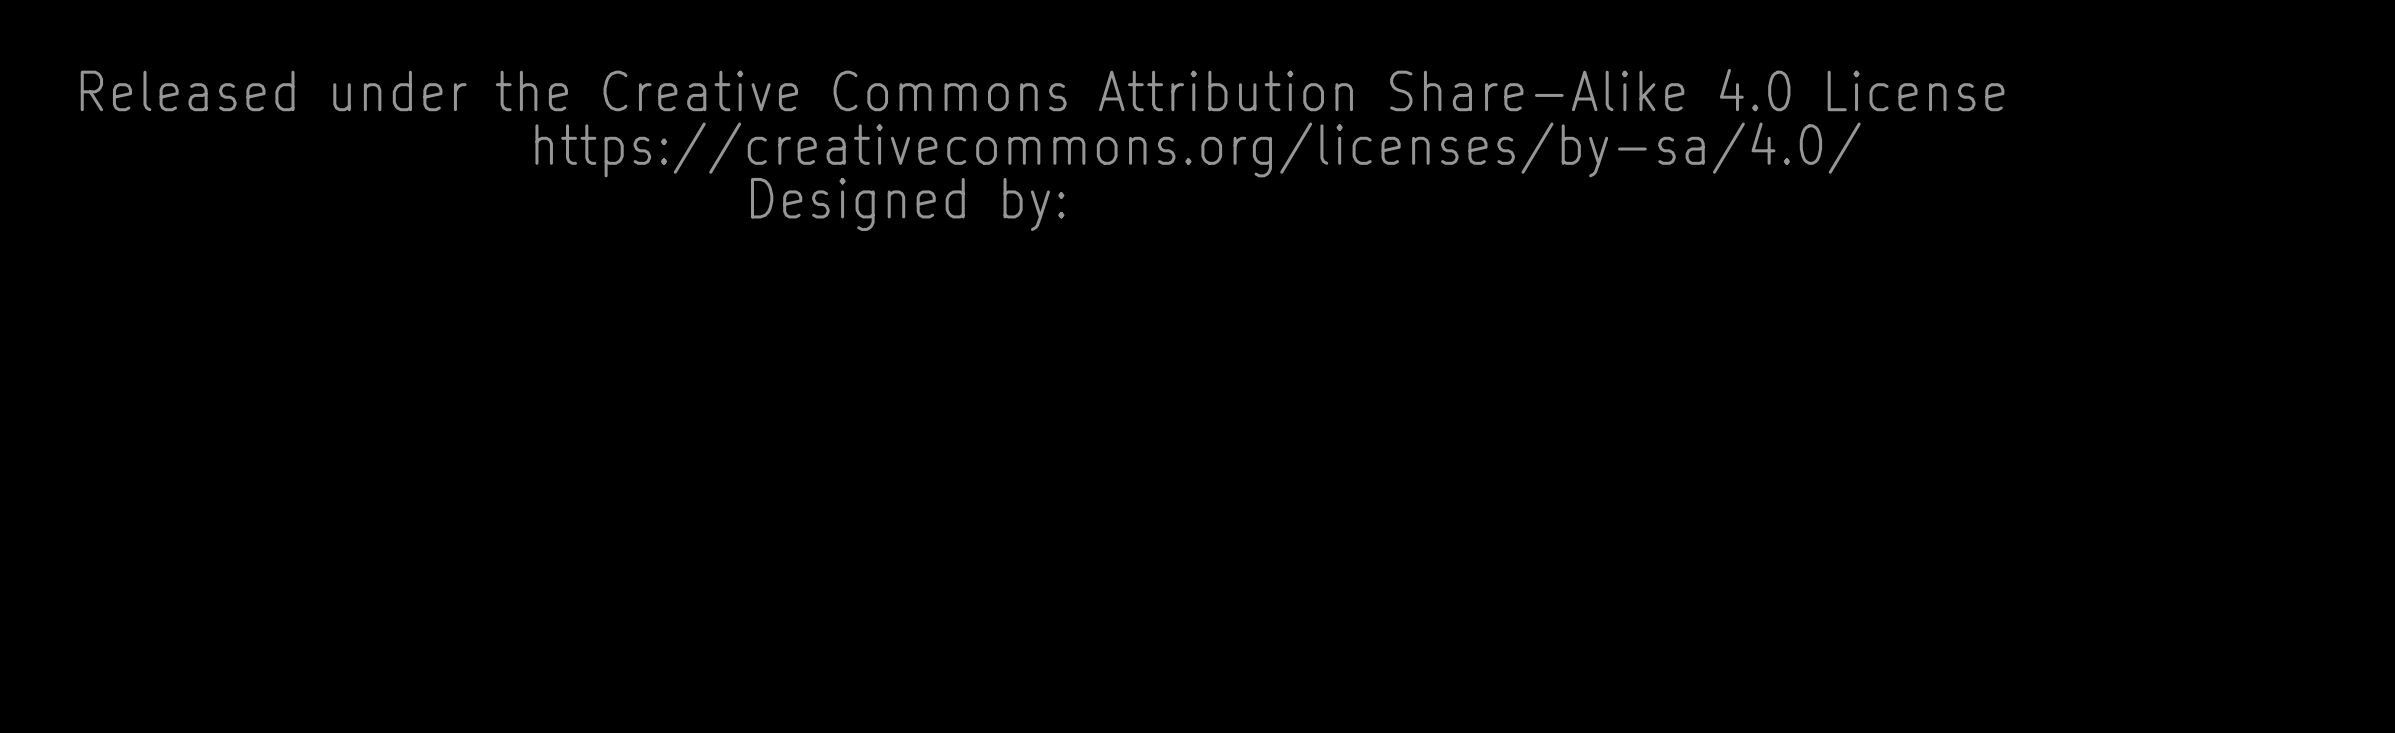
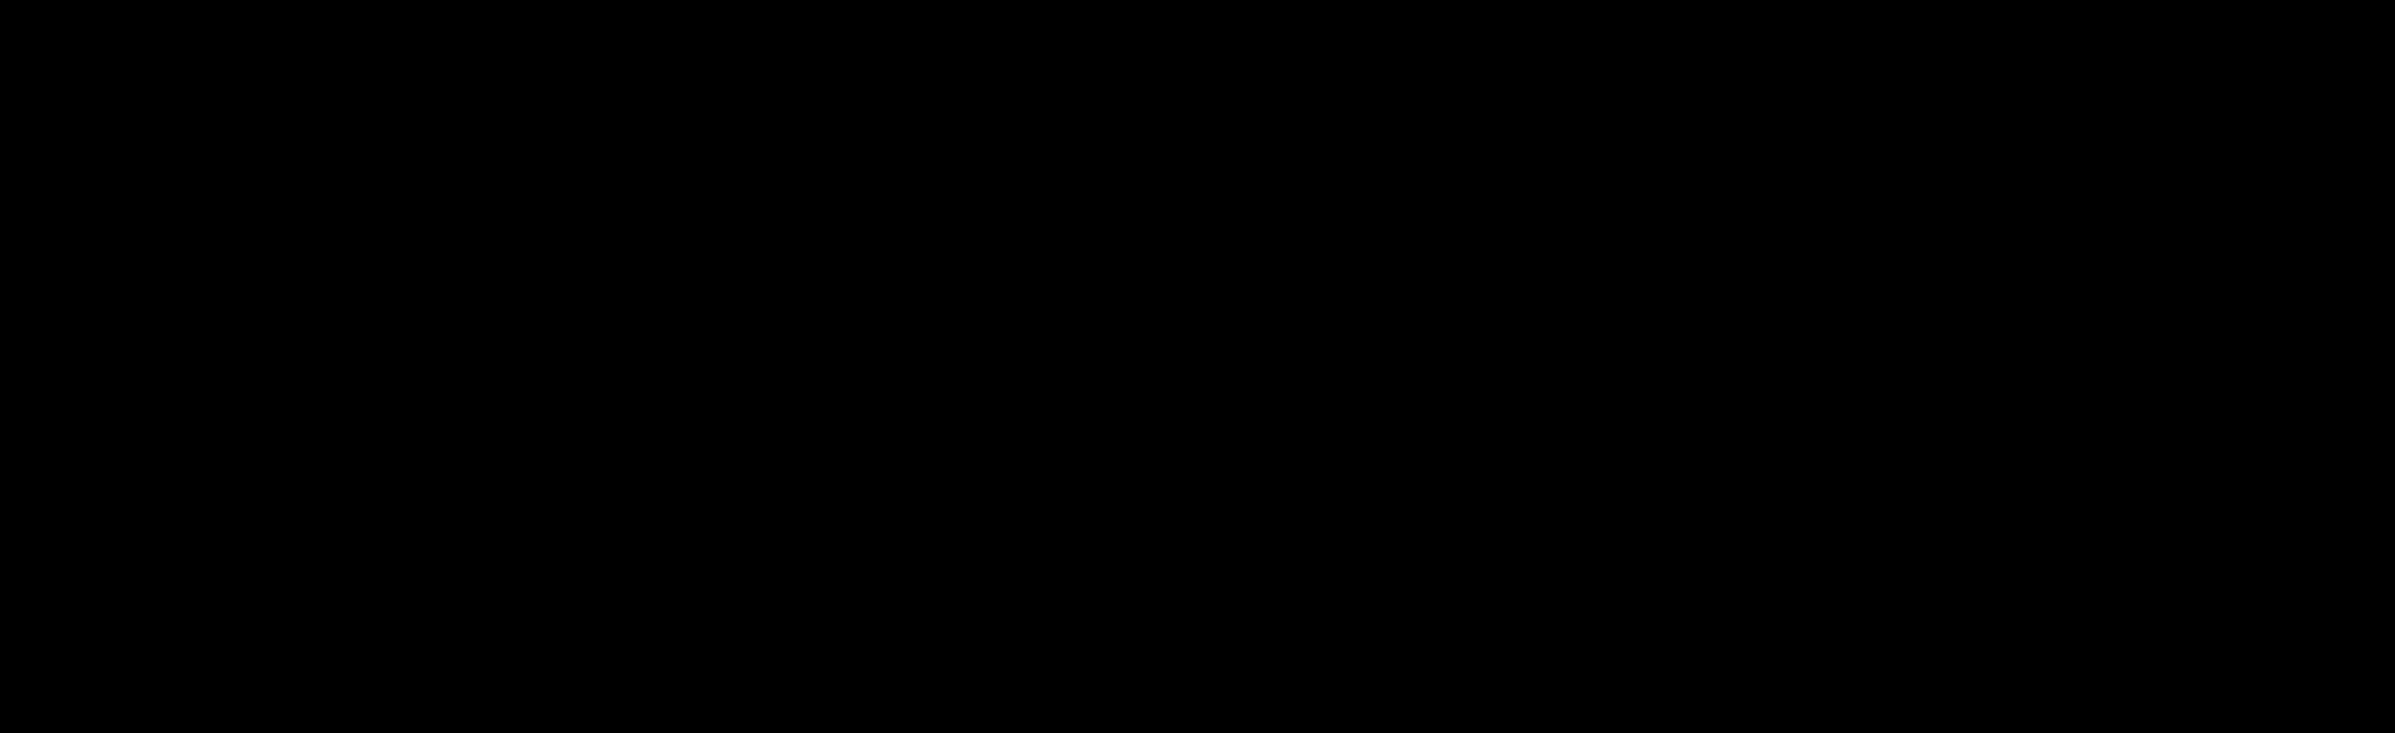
drawing: [80, 68, 2005, 231] -> none

